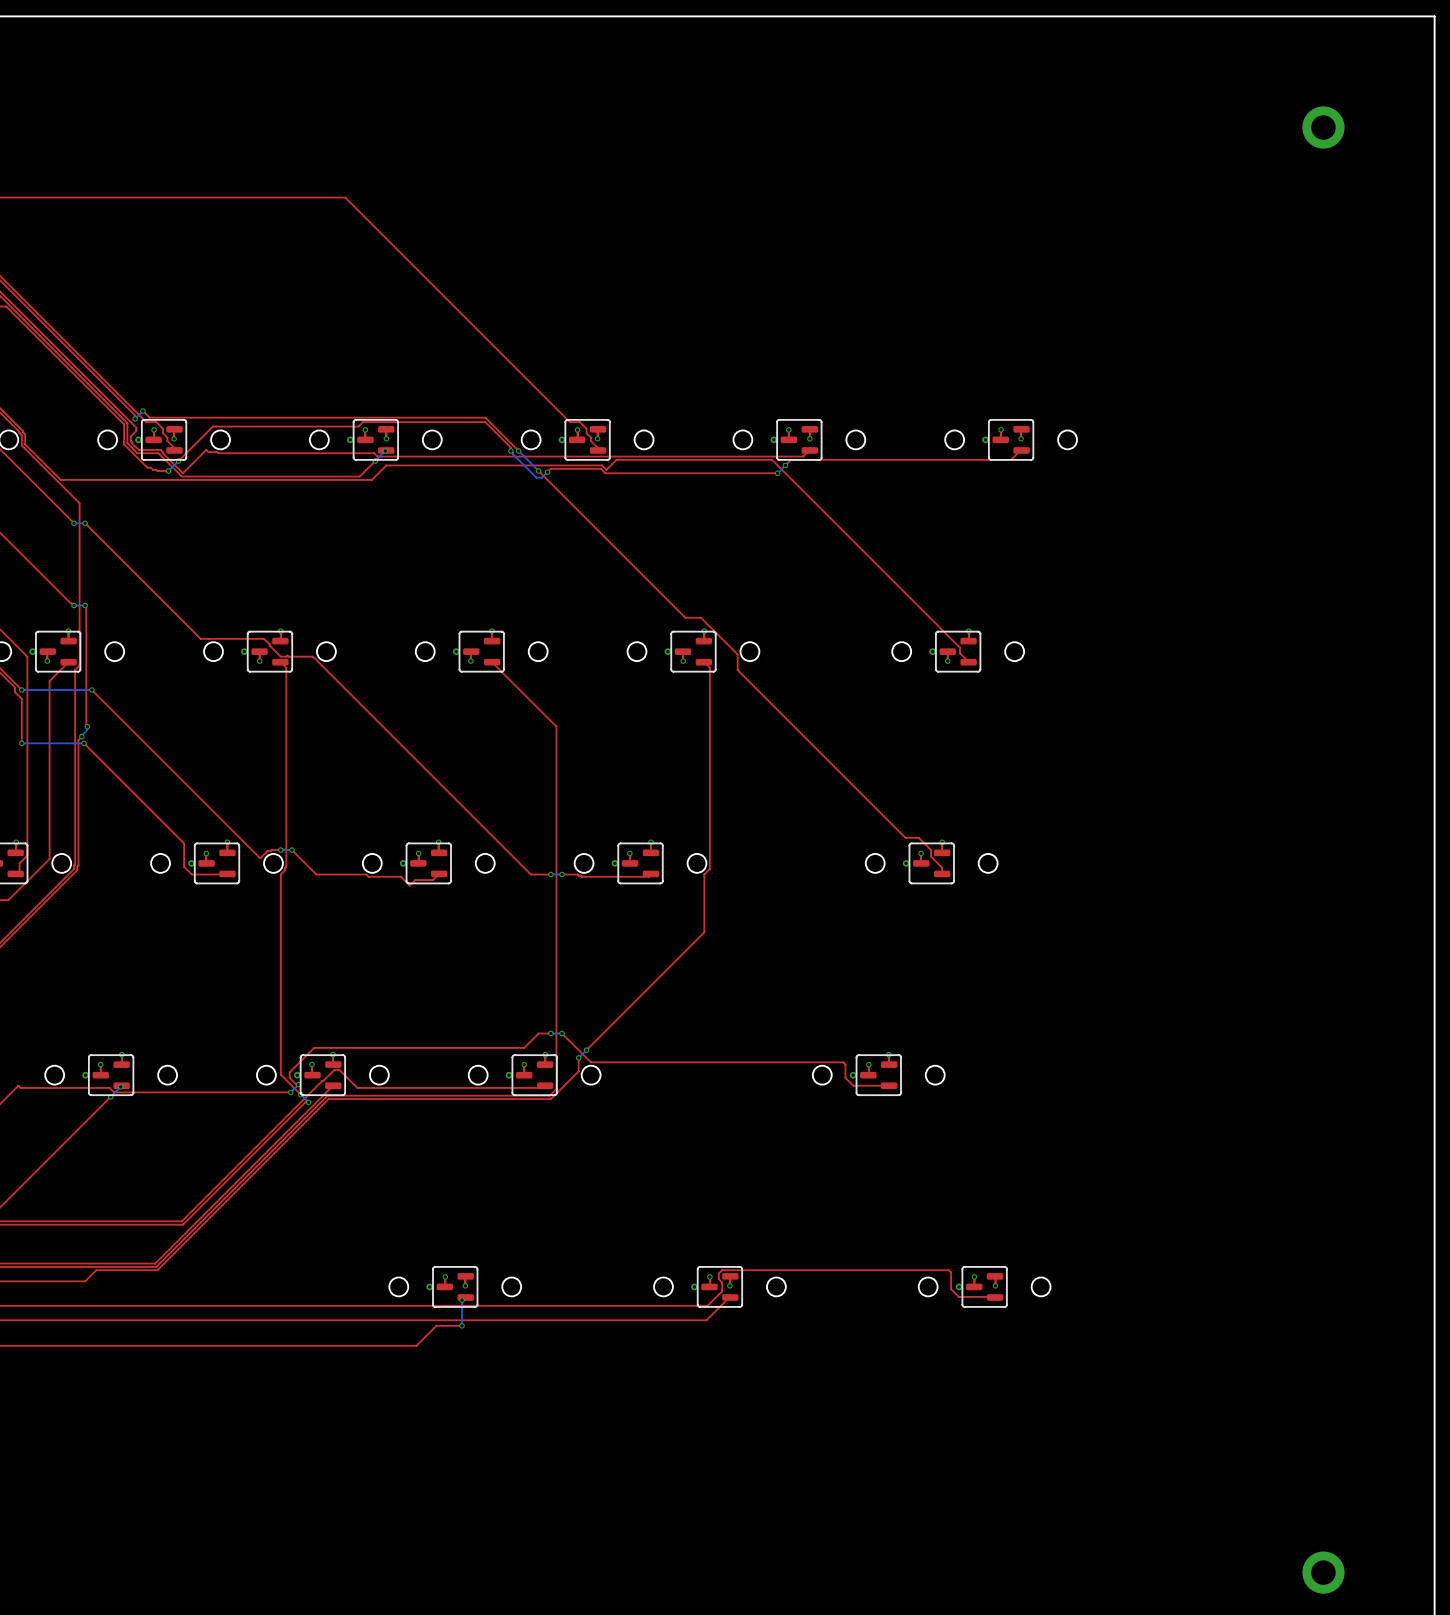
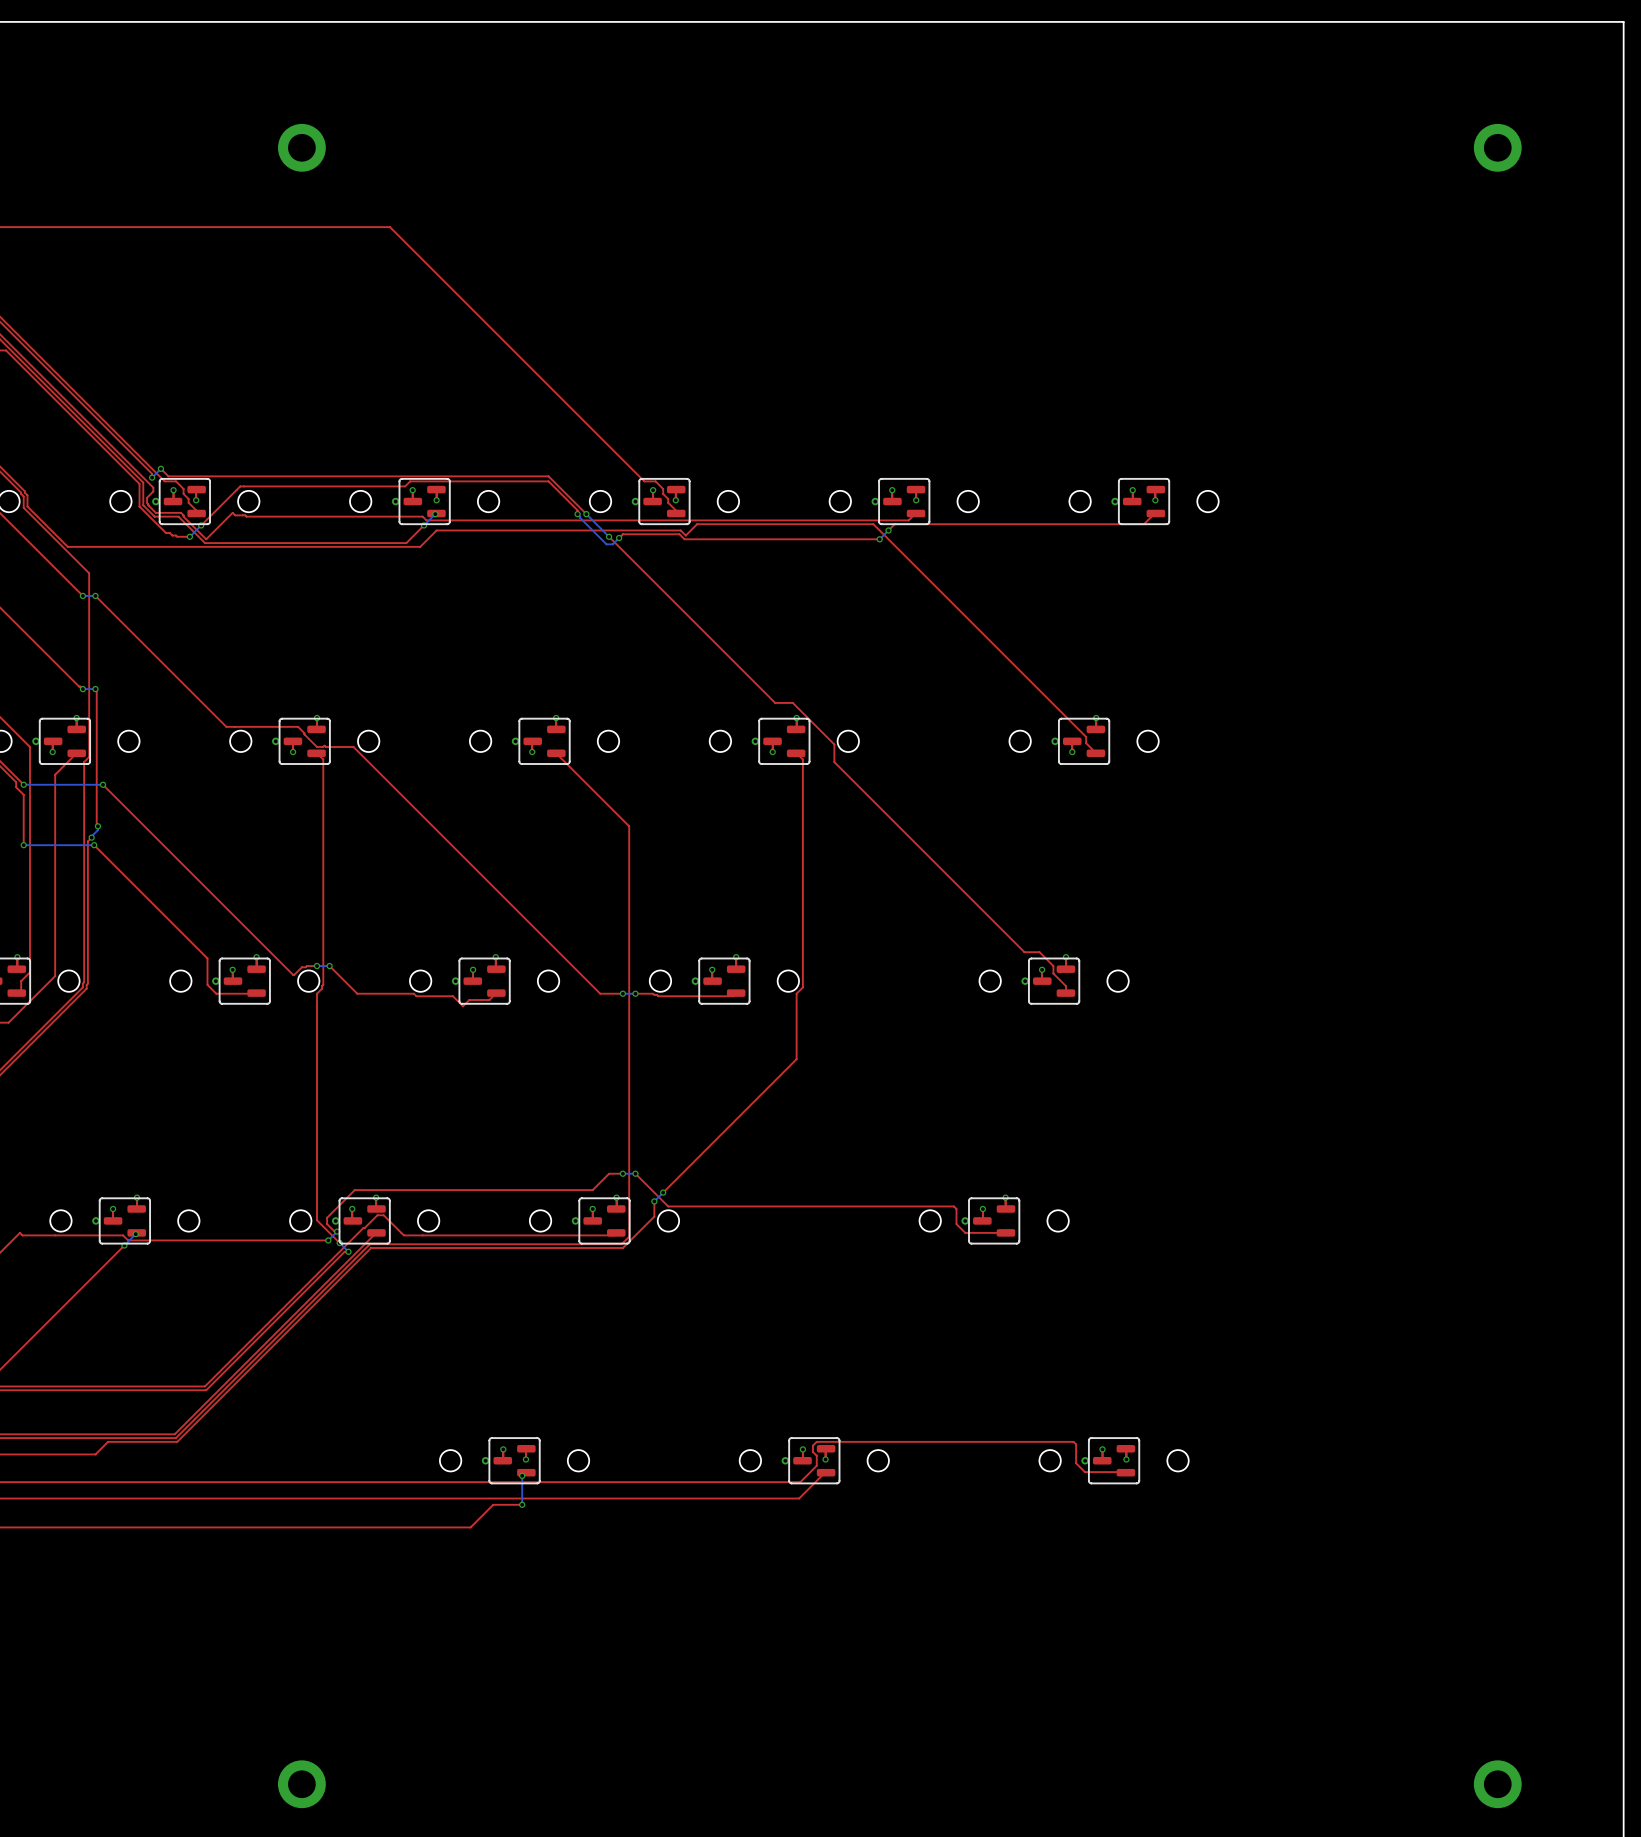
part: none -> (301, 147)
part: none -> (301, 1784)

